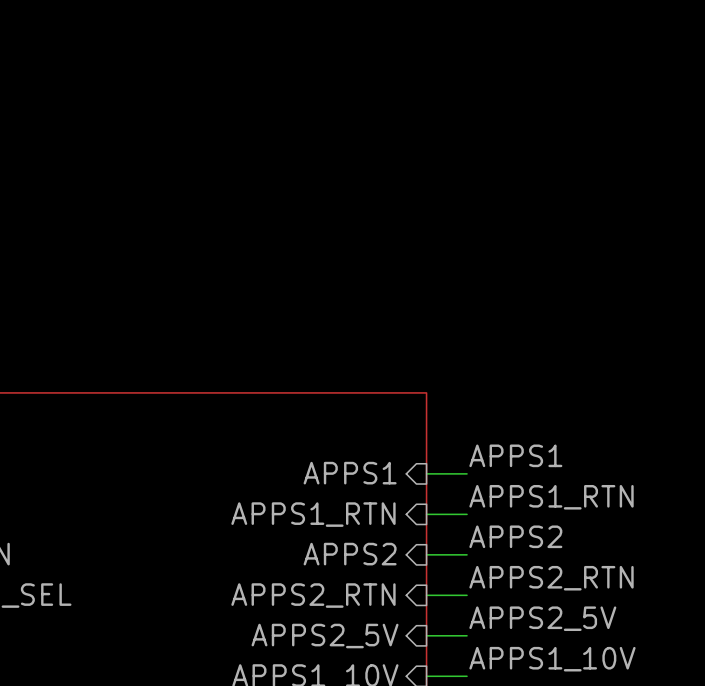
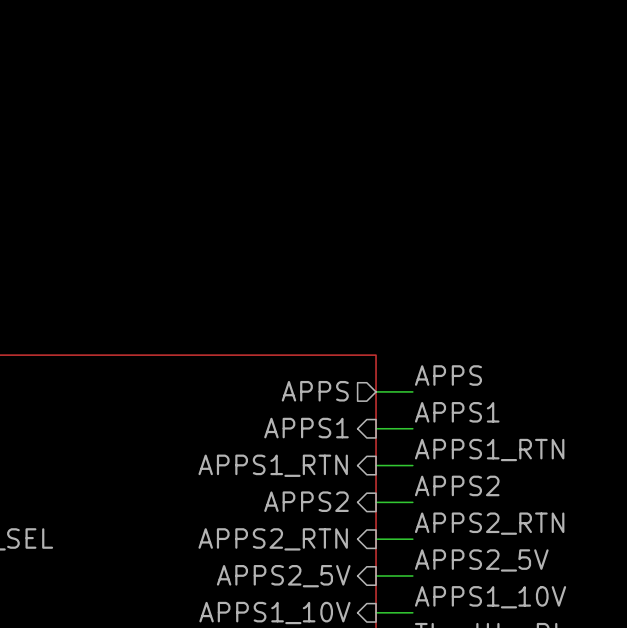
label: none -> APPS (448, 375)
sheet pin: none -> APPS (315, 391)
wire: none -> (376, 391) (412, 391)

